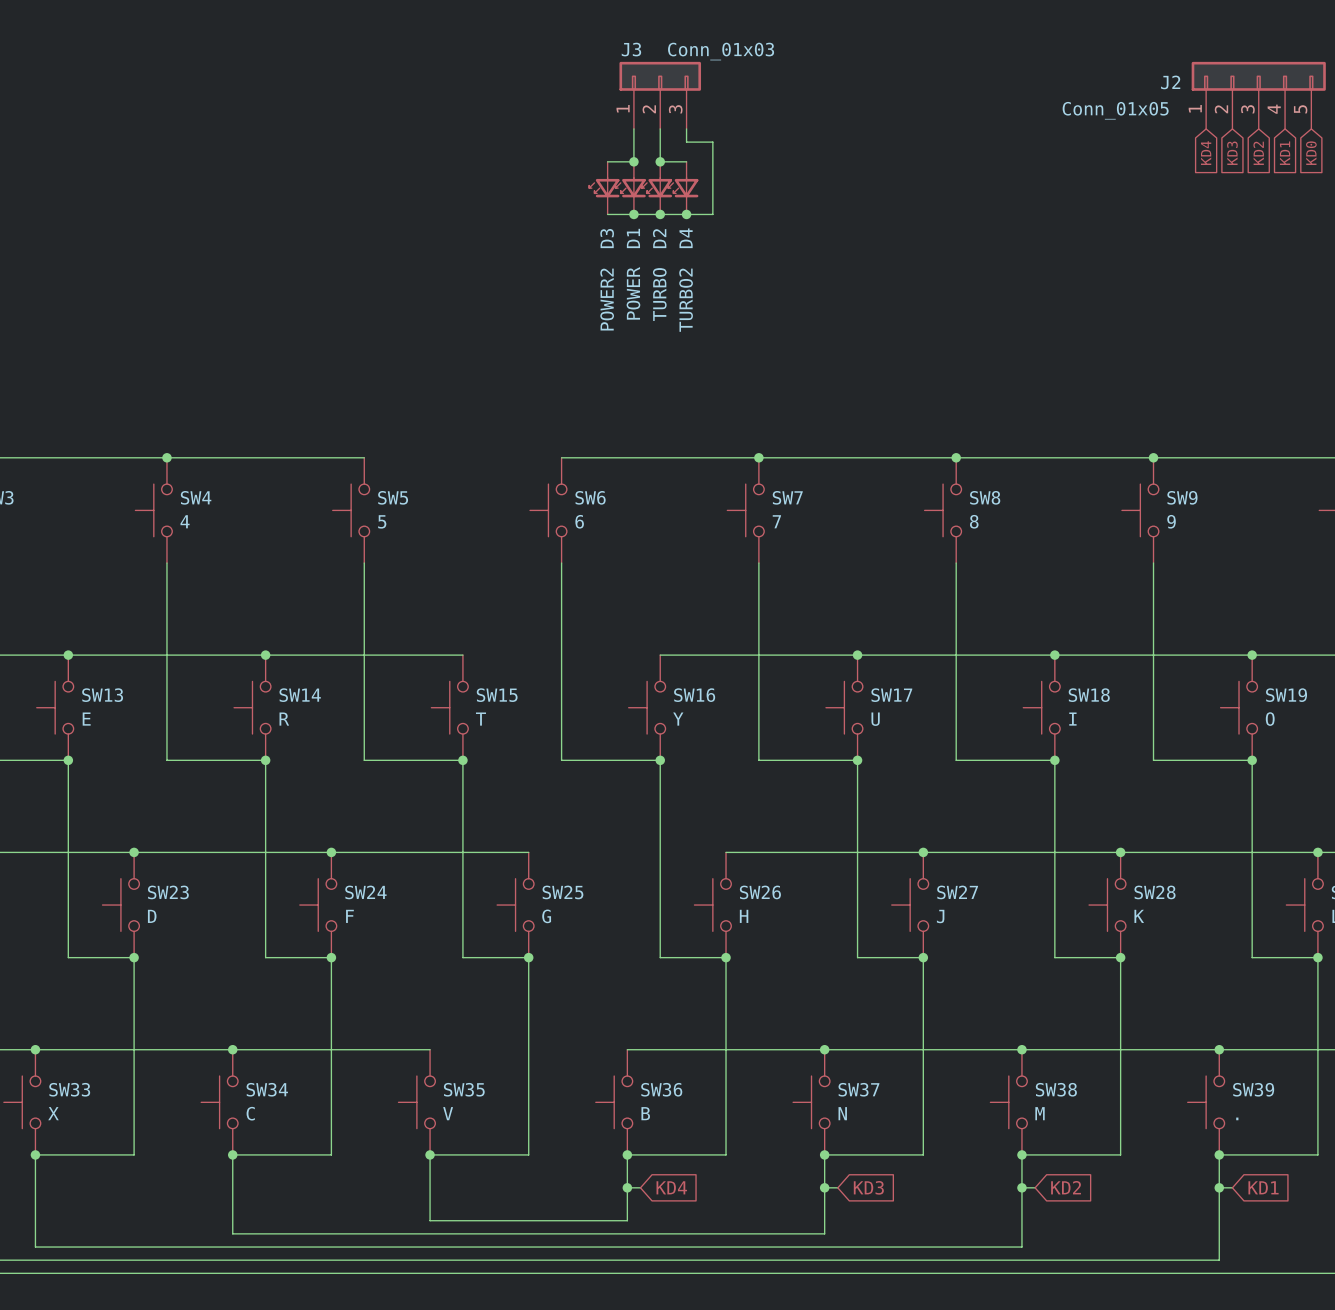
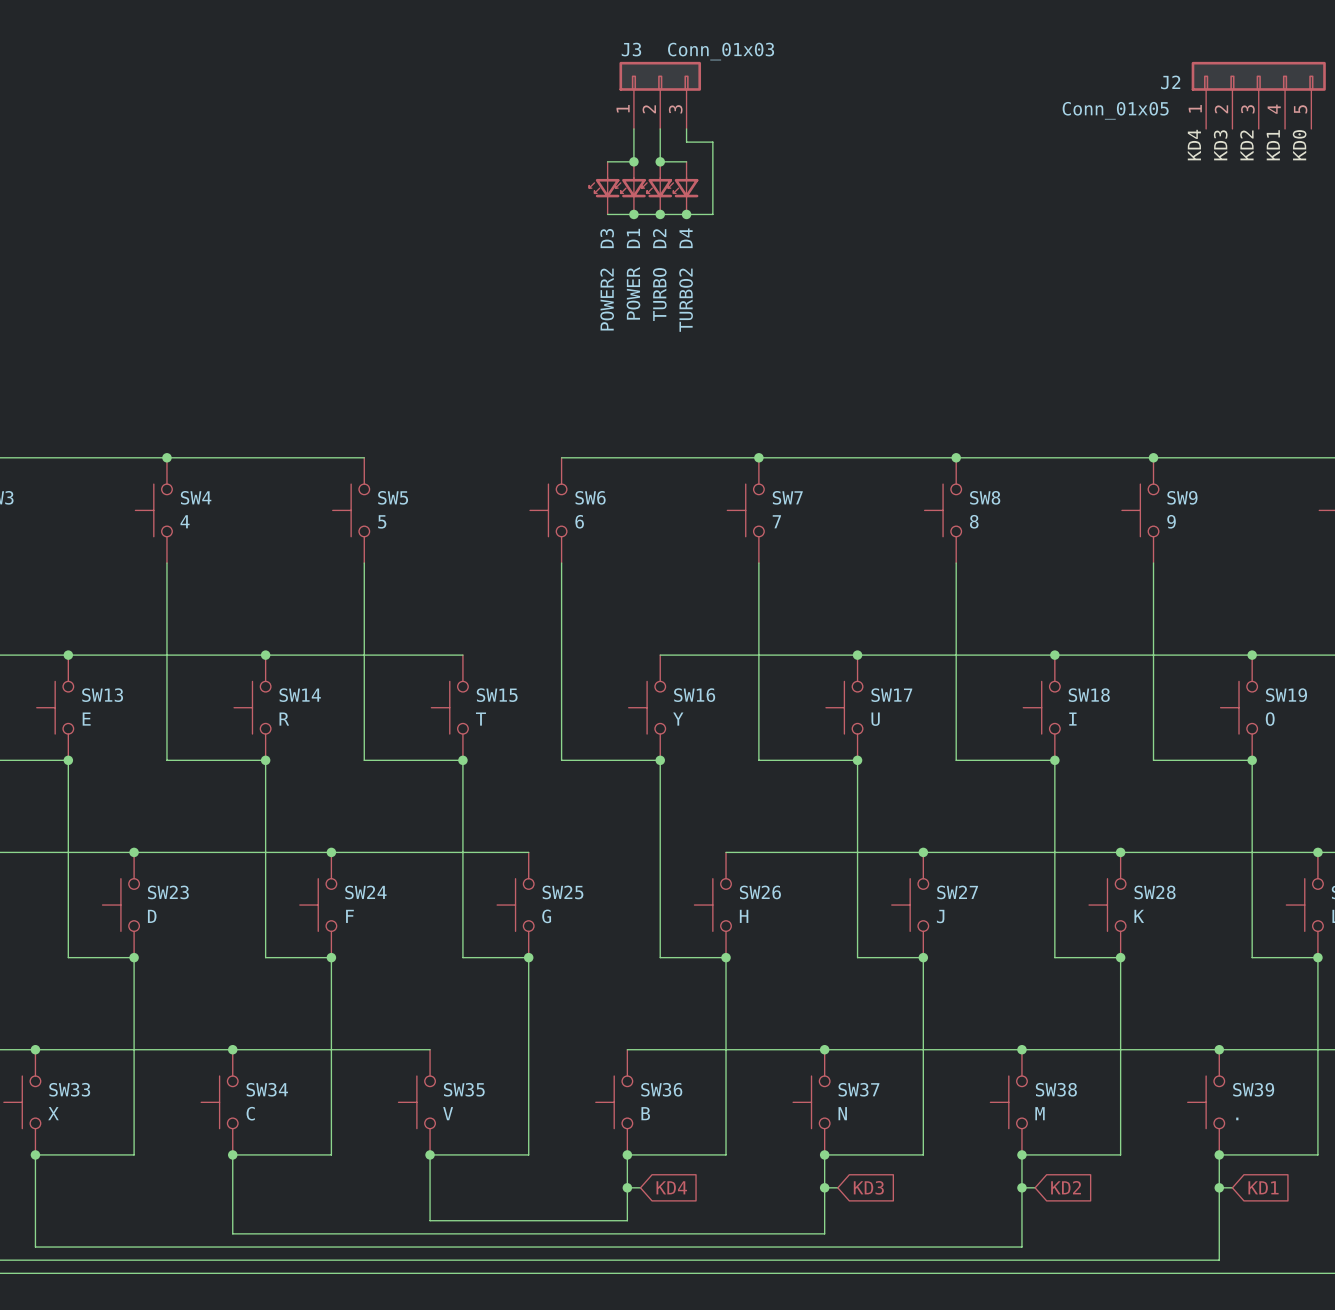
label: none -> KD4 (1194, 145)
label: none -> KD3 (1220, 145)
label: none -> KD2 (1246, 145)
label: none -> KD1 (1273, 145)
label: none -> KD0 (1299, 145)
global label: KD4 (1206, 153) -> none
global label: KD3 (1232, 153) -> none
global label: KD2 (1258, 153) -> none
global label: KD1 (1285, 153) -> none
global label: KD0 (1311, 153) -> none

